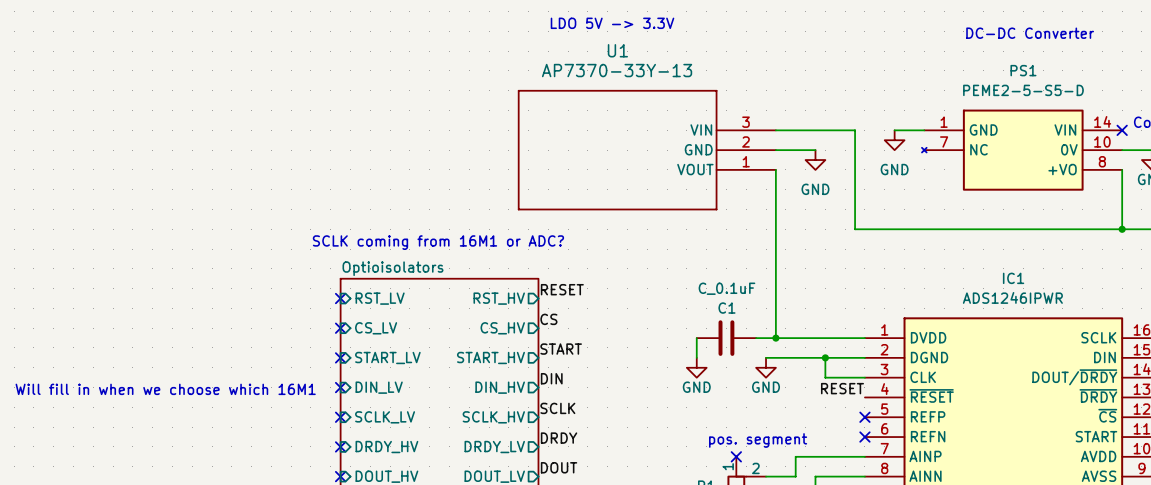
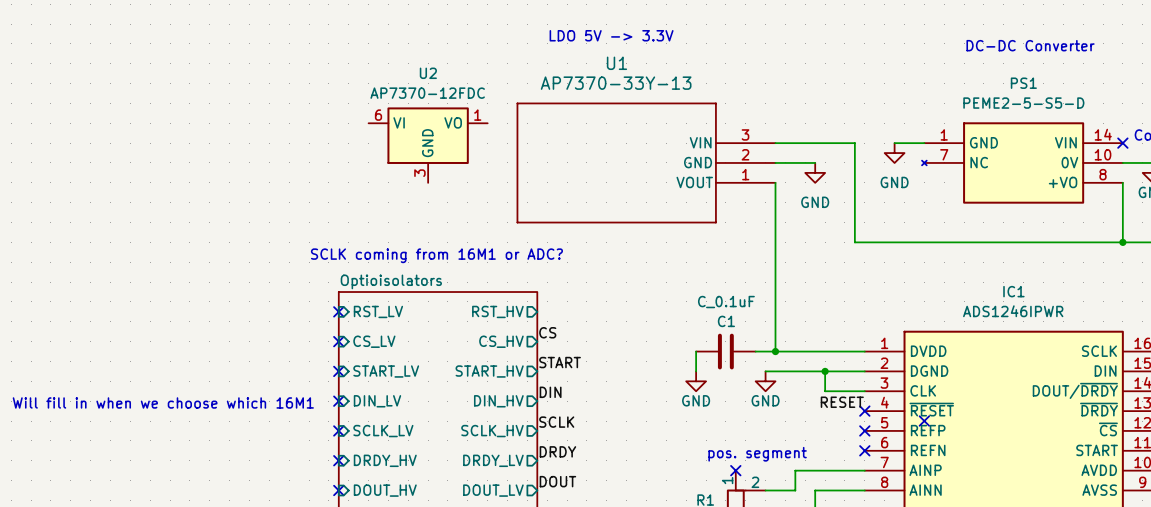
U2: none -> AP7370-12FDC (428, 145)
label: RESET (562, 289) -> none
no-connect mark: none -> (864, 411)
no-connect mark: none -> (924, 421)

